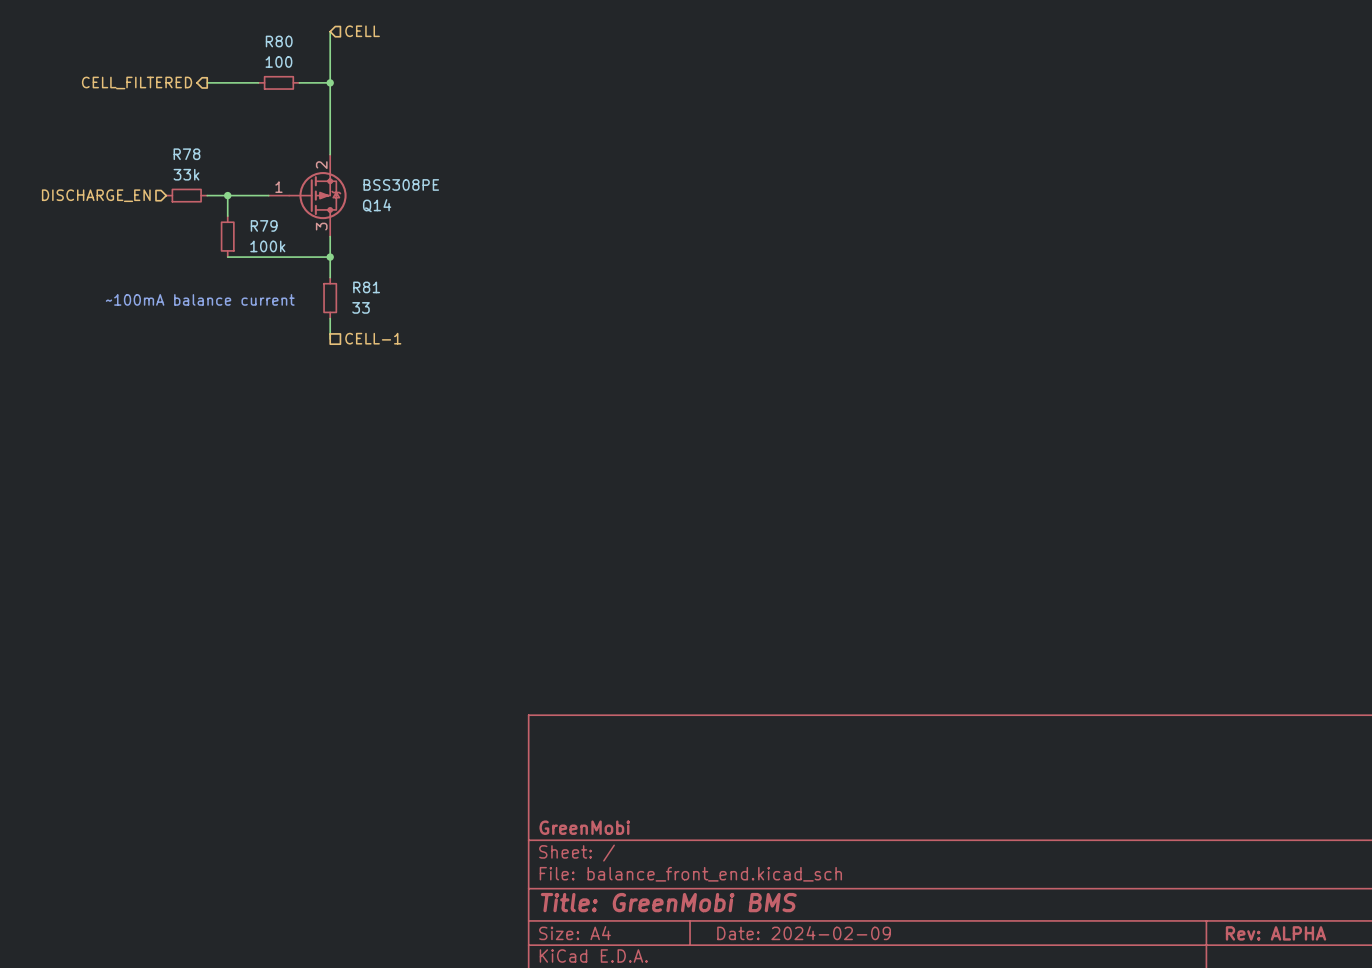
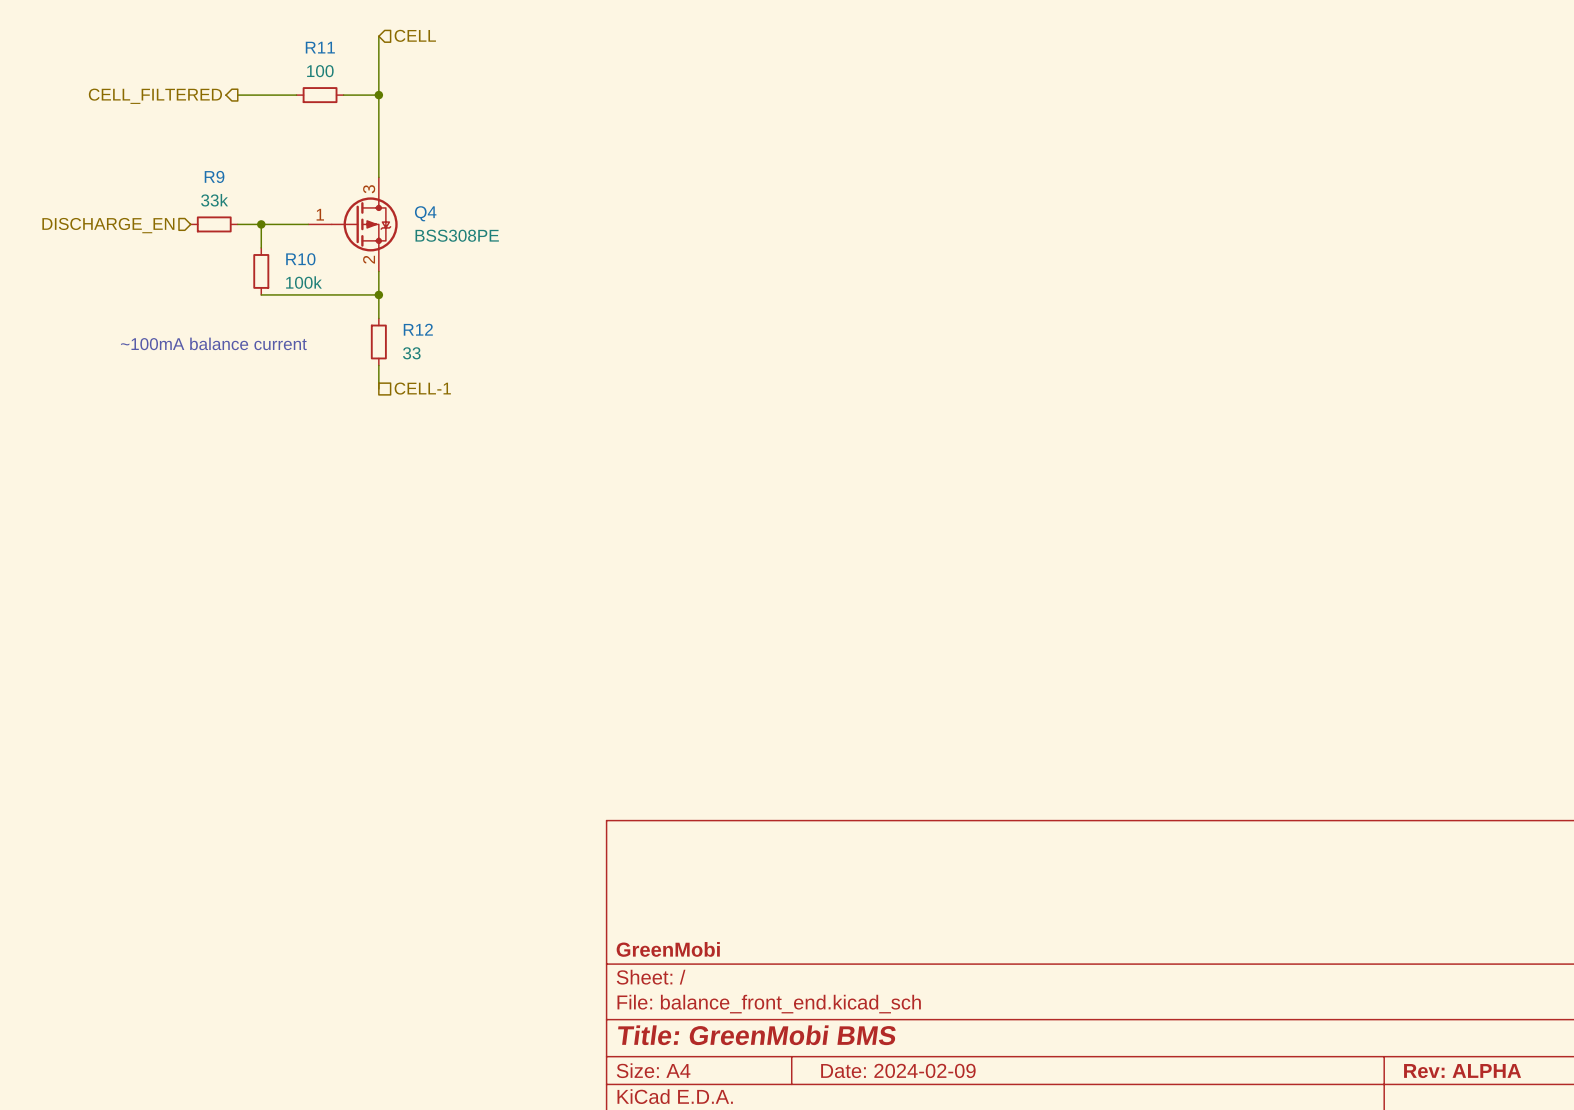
R80 name: R80 (279, 41) -> R11 (320, 47)
R78 name: R78 (186, 154) -> R9 (214, 176)
Q14: BSS308PE (307, 195) -> none
Q4: none -> BSS308PE (352, 224)
R79 name: R79 (264, 225) -> R10 (300, 259)
R81 name: R81 (366, 287) -> R12 (418, 329)

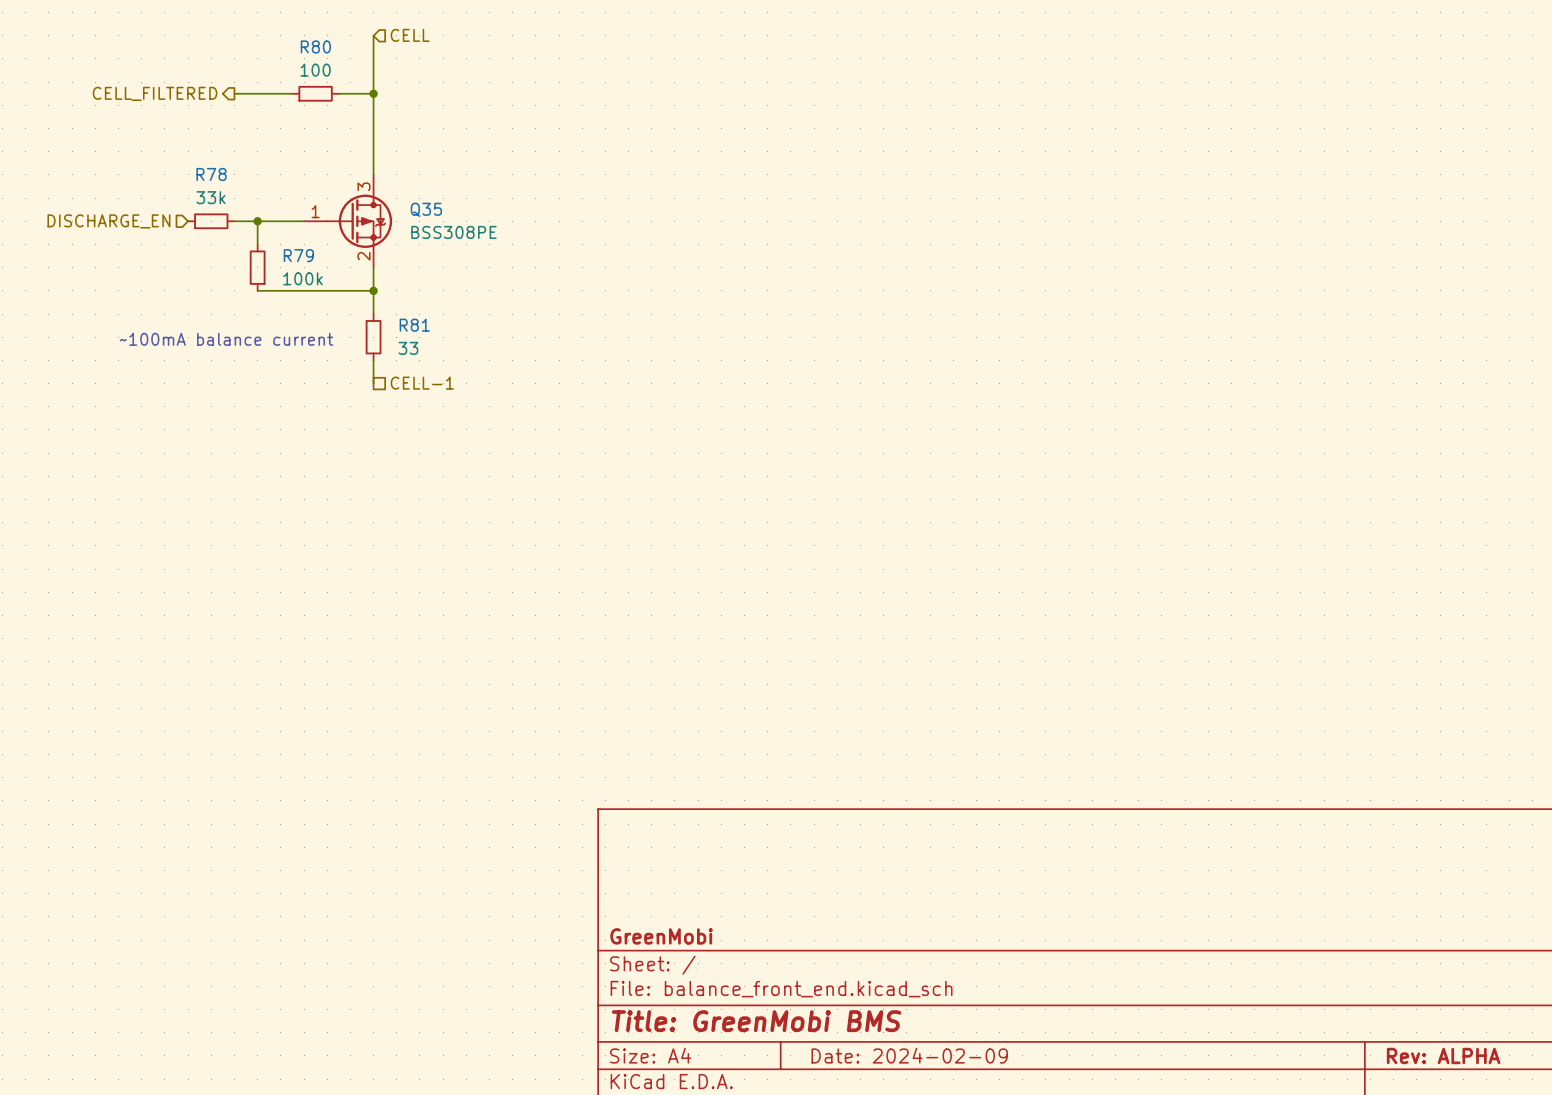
R11 name: R11 (320, 47) -> R80 (315, 46)
R9 name: R9 (214, 176) -> R78 (211, 174)
Q4 name: Q4 (425, 213) -> Q35 (426, 209)
R10 name: R10 (300, 259) -> R79 (298, 255)
R12 name: R12 (418, 329) -> R81 (414, 325)

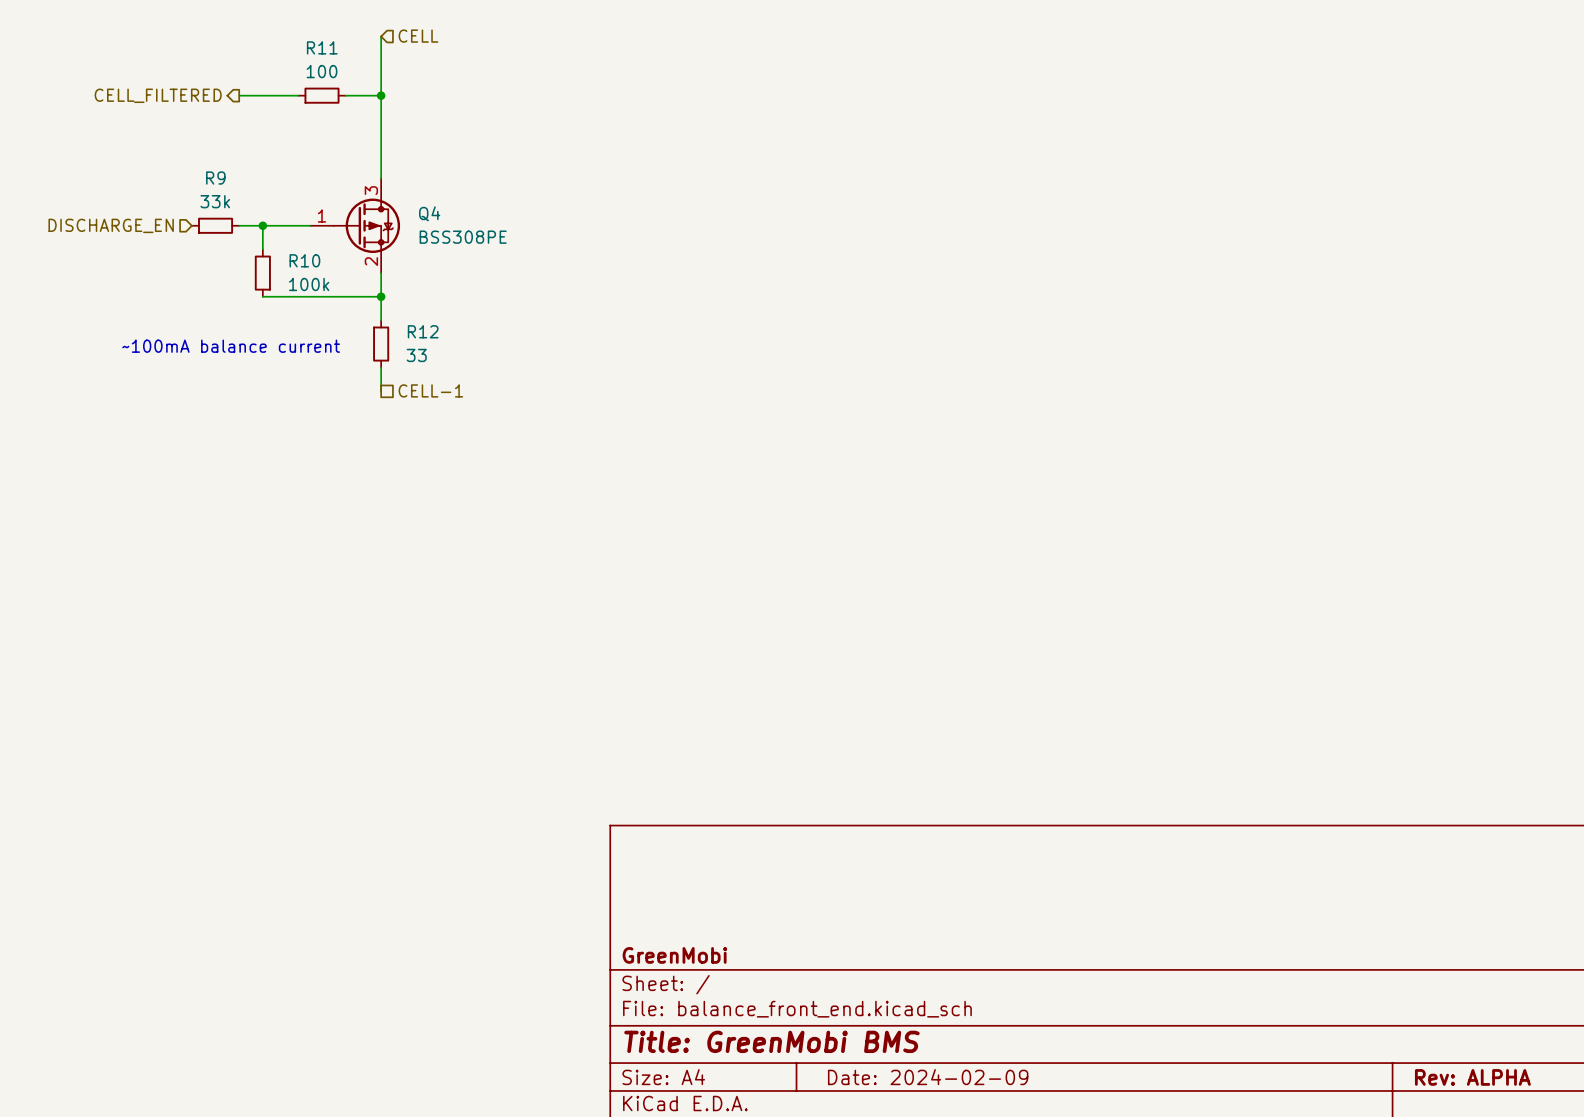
R80 name: R80 (315, 46) -> R11 (322, 47)
R78 name: R78 (211, 174) -> R9 (215, 178)
Q35 name: Q35 (426, 209) -> Q4 (429, 213)
R79 name: R79 (298, 255) -> R10 (304, 260)
R81 name: R81 (414, 325) -> R12 (423, 331)

